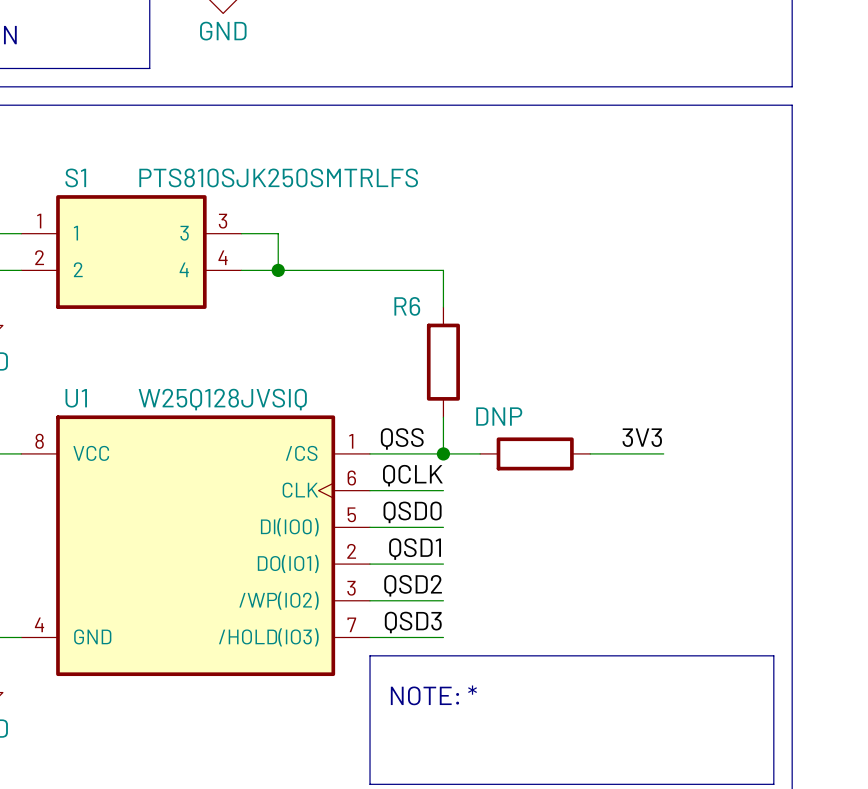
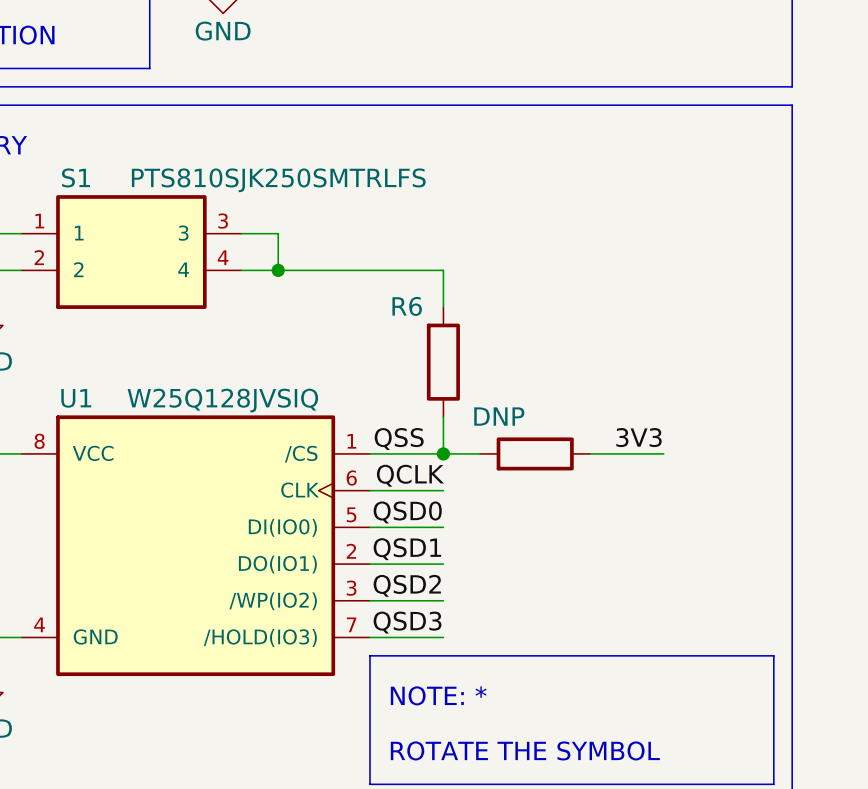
text: none -> ROTATE THE SYMBOL (525, 750)

